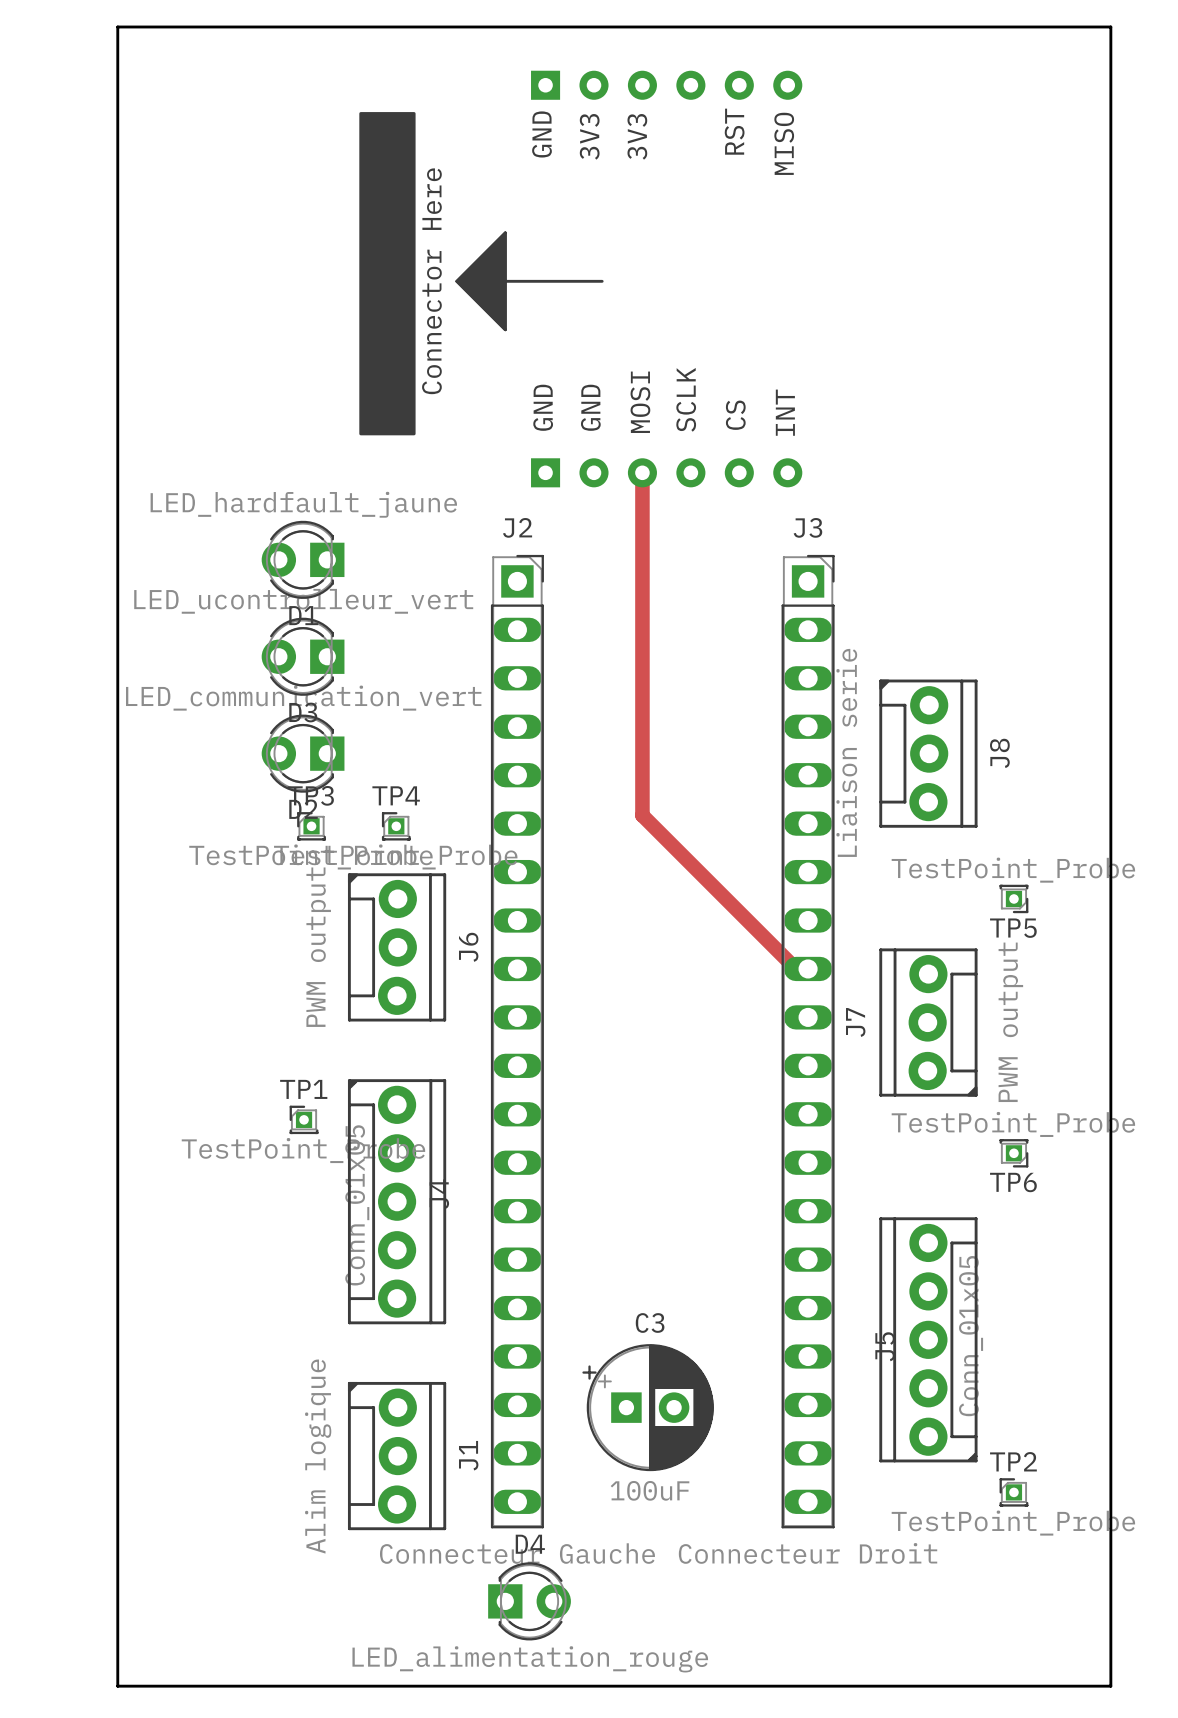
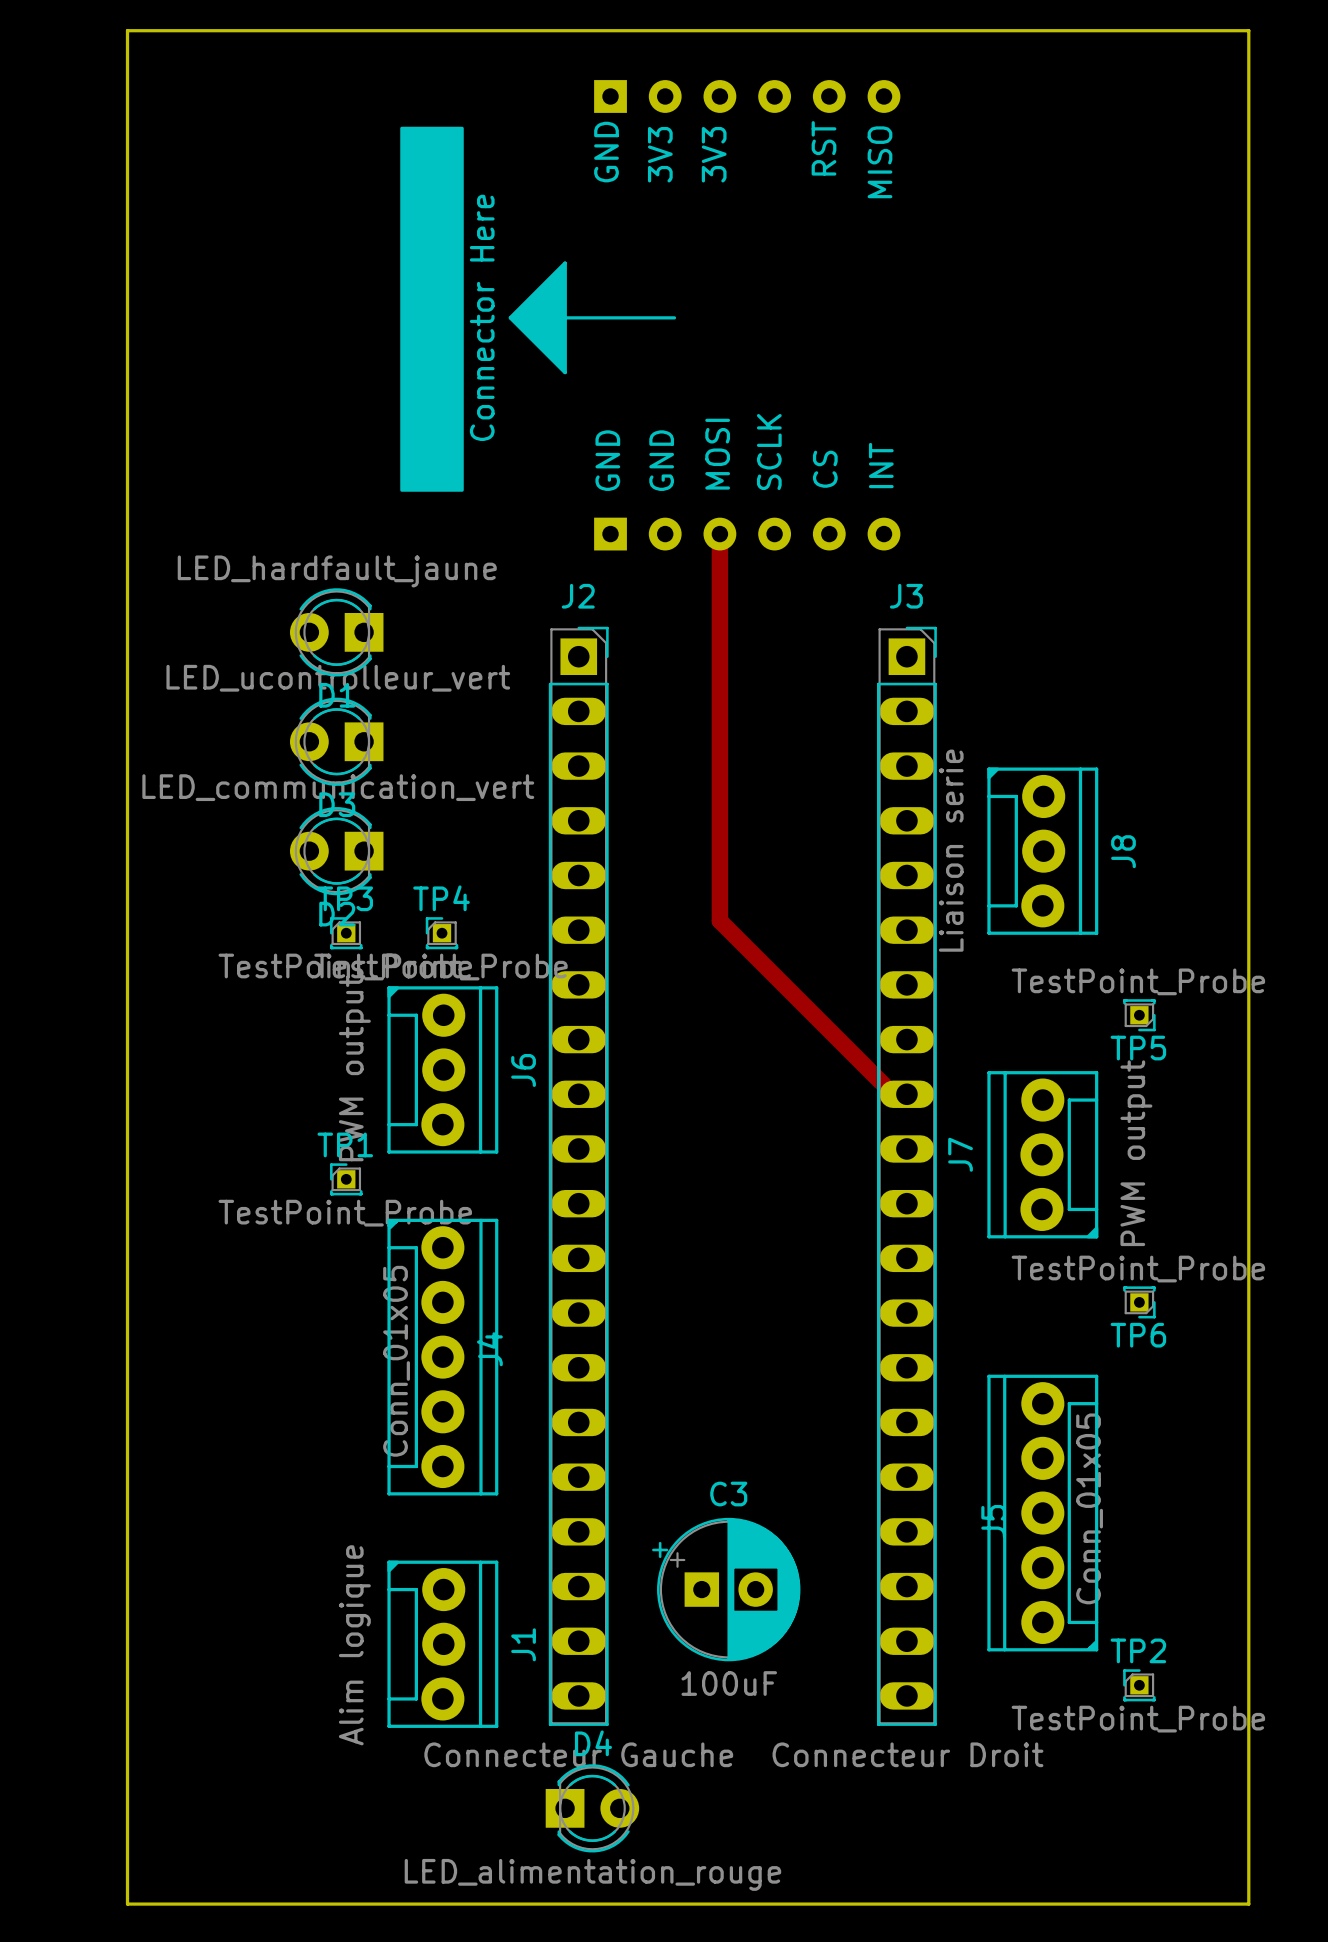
TP1 position: (304, 1119) -> (346, 1179)

